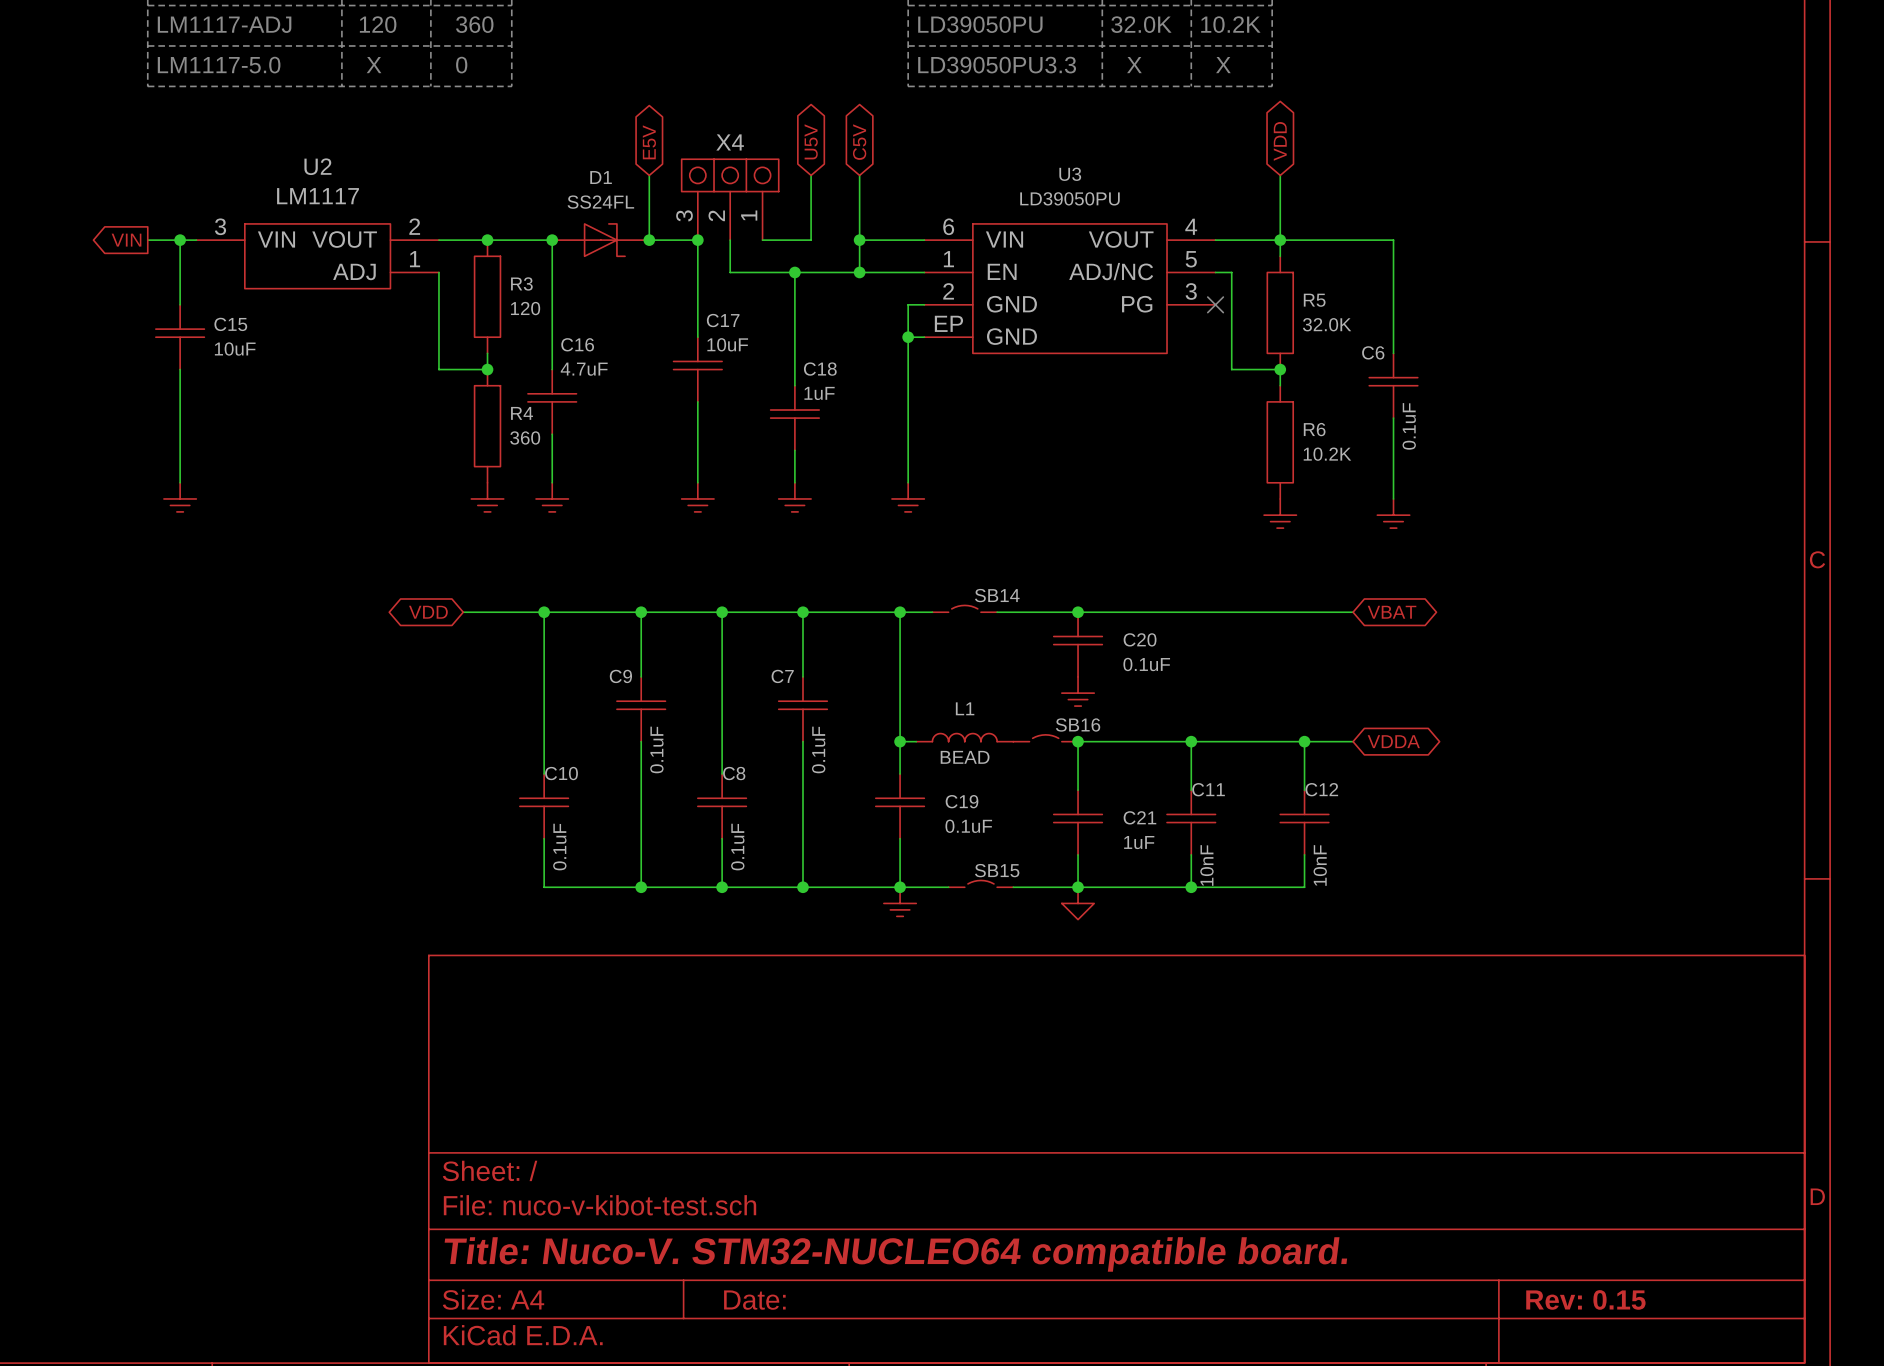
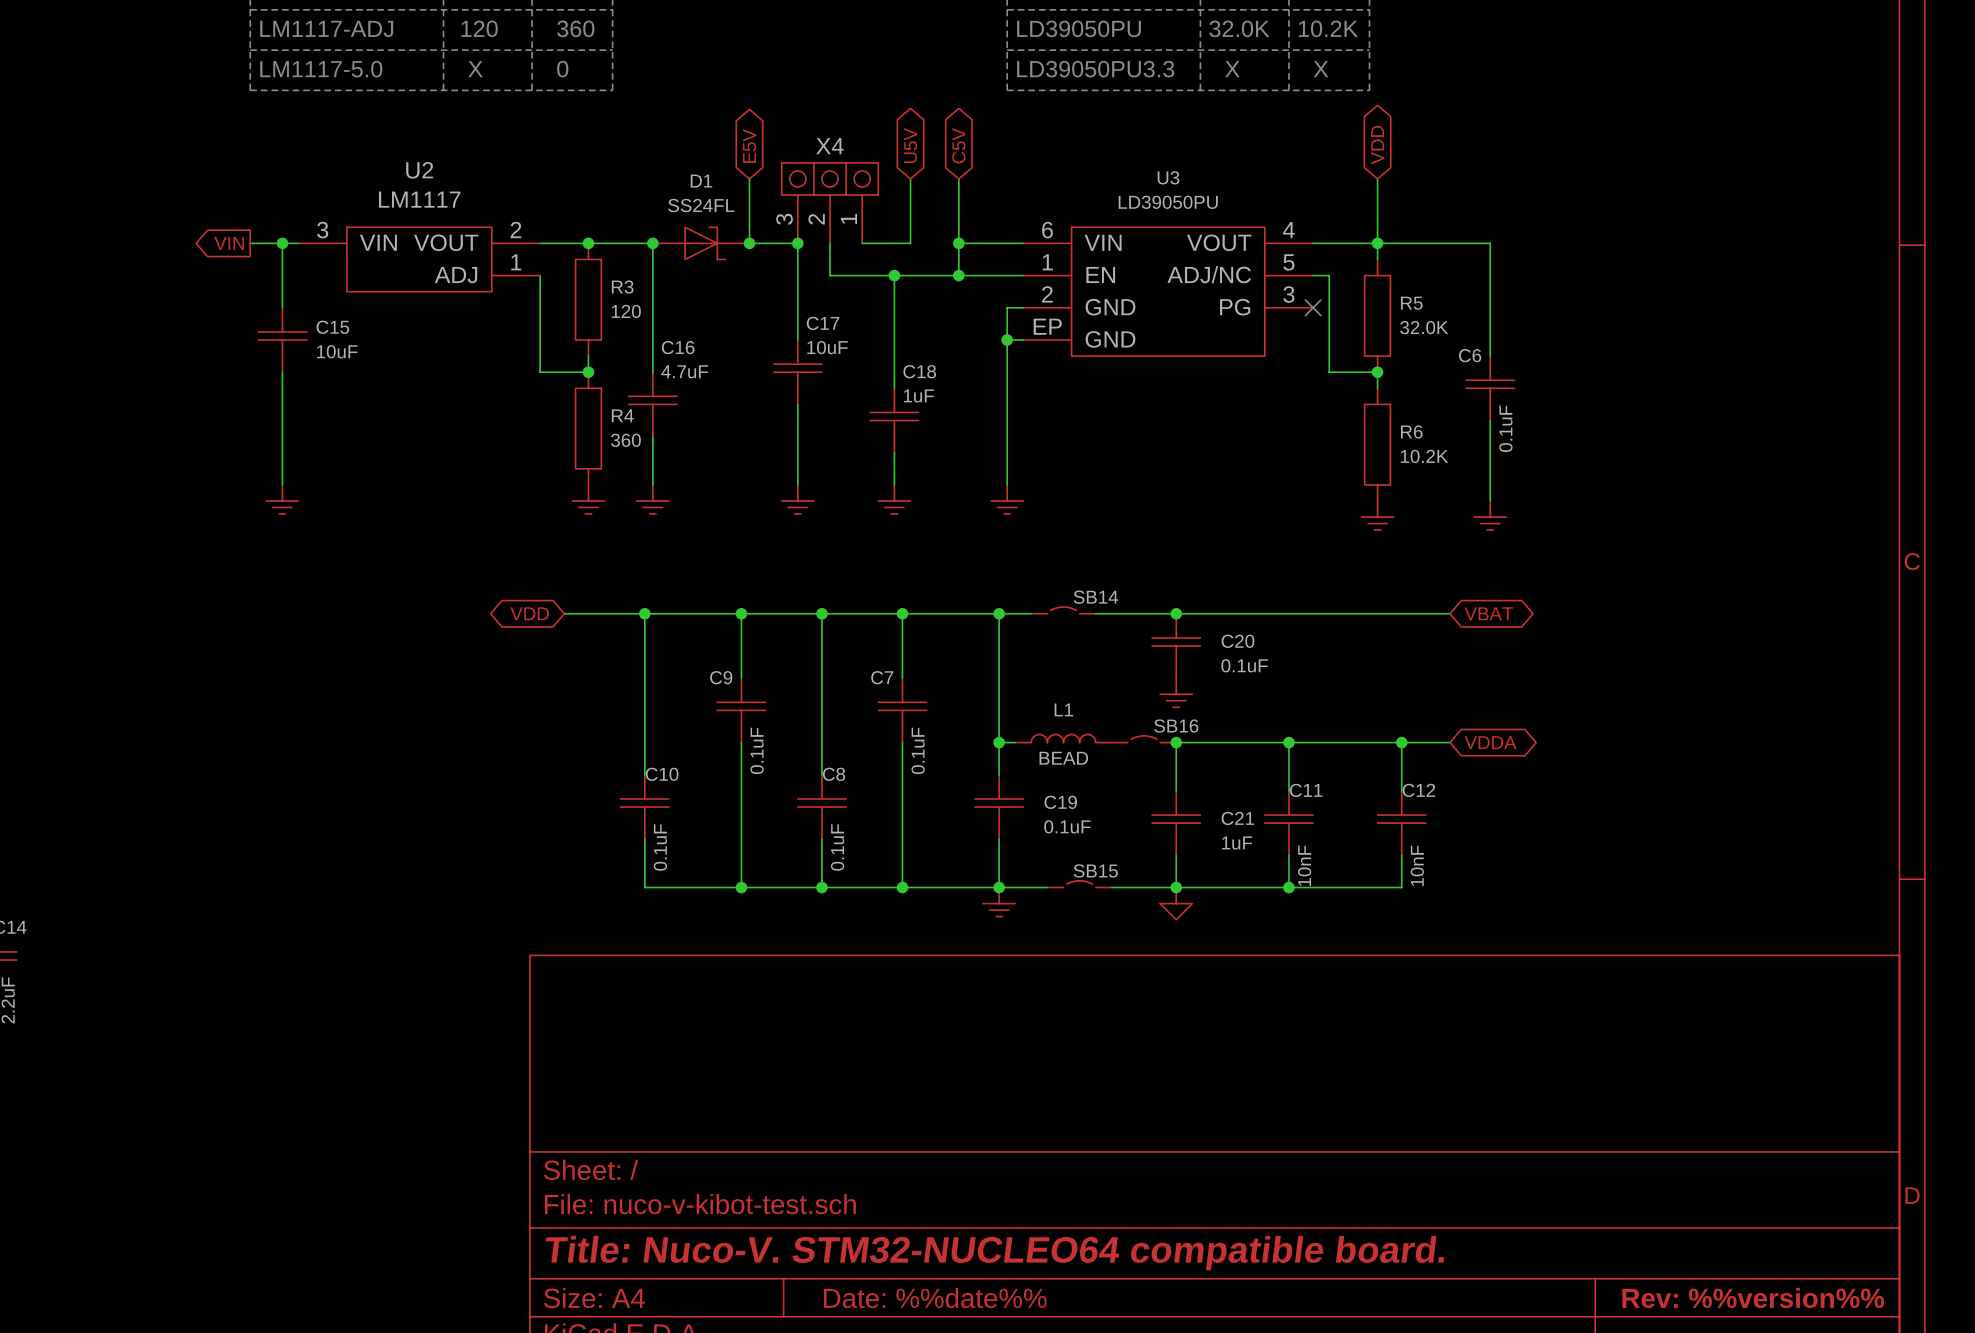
title block: Rev: 0.15 (1585, 1299) -> Rev: %%version%% (1753, 1297)
title block: Date: (754, 1300) -> Date: %%date%% (935, 1297)

